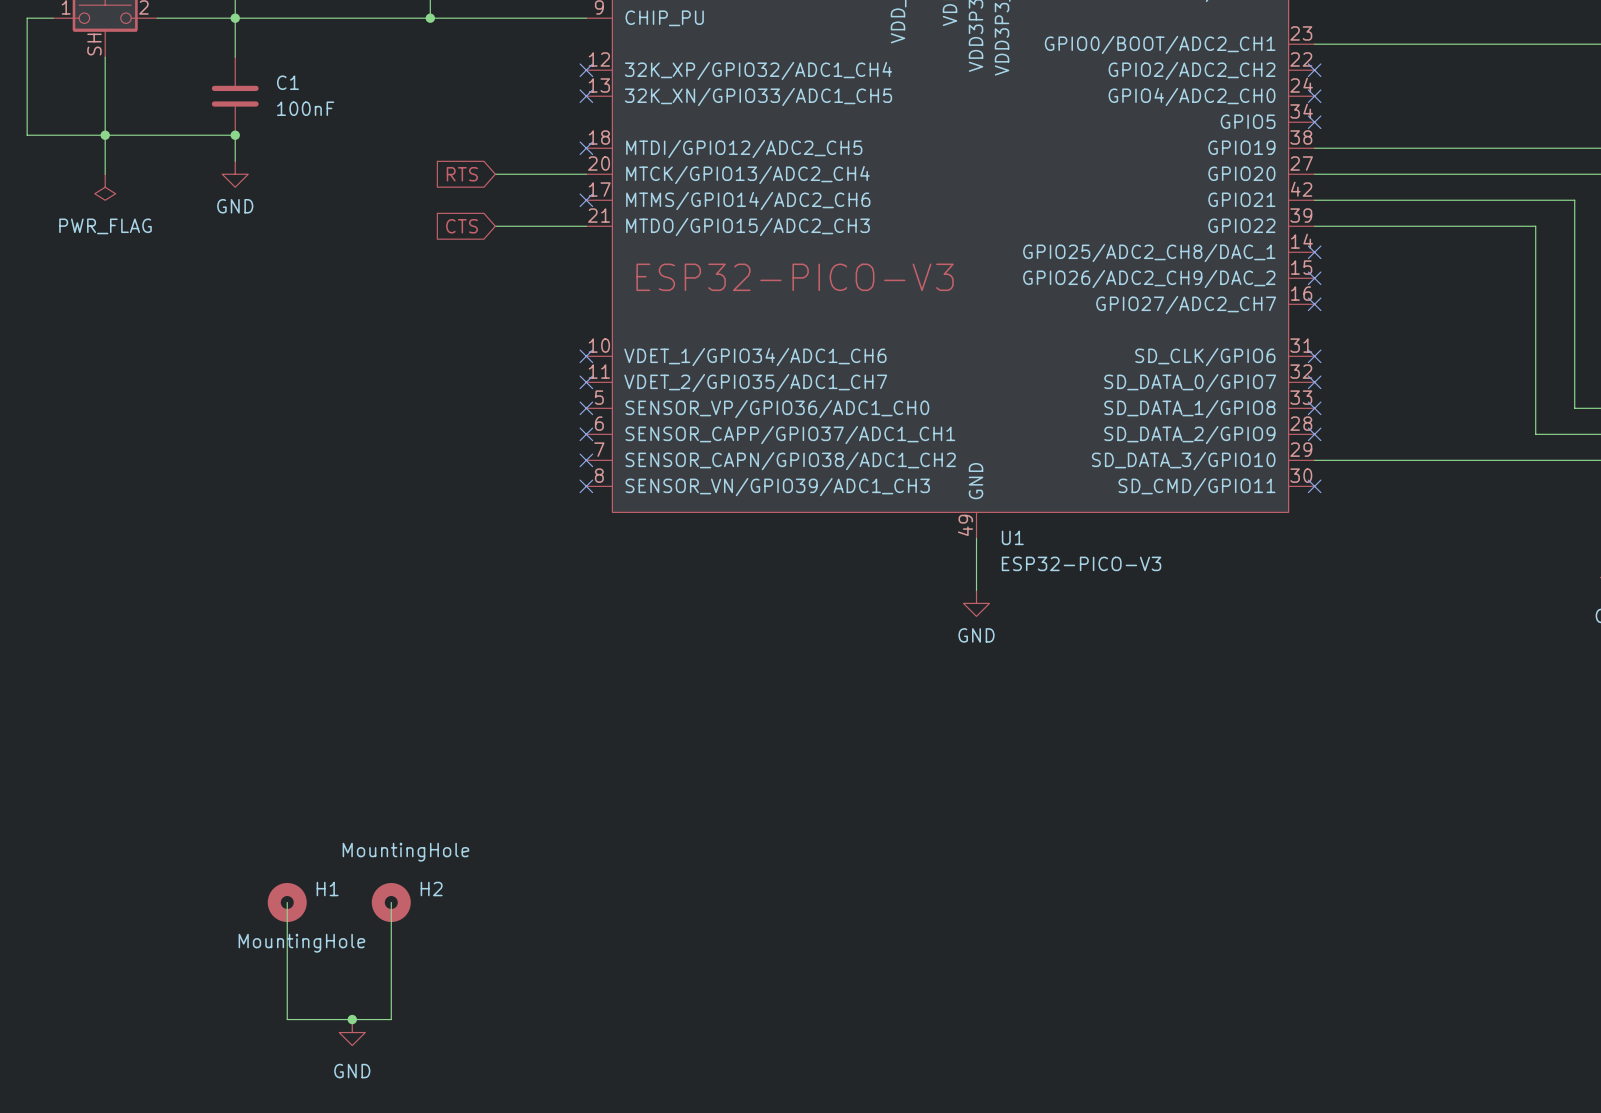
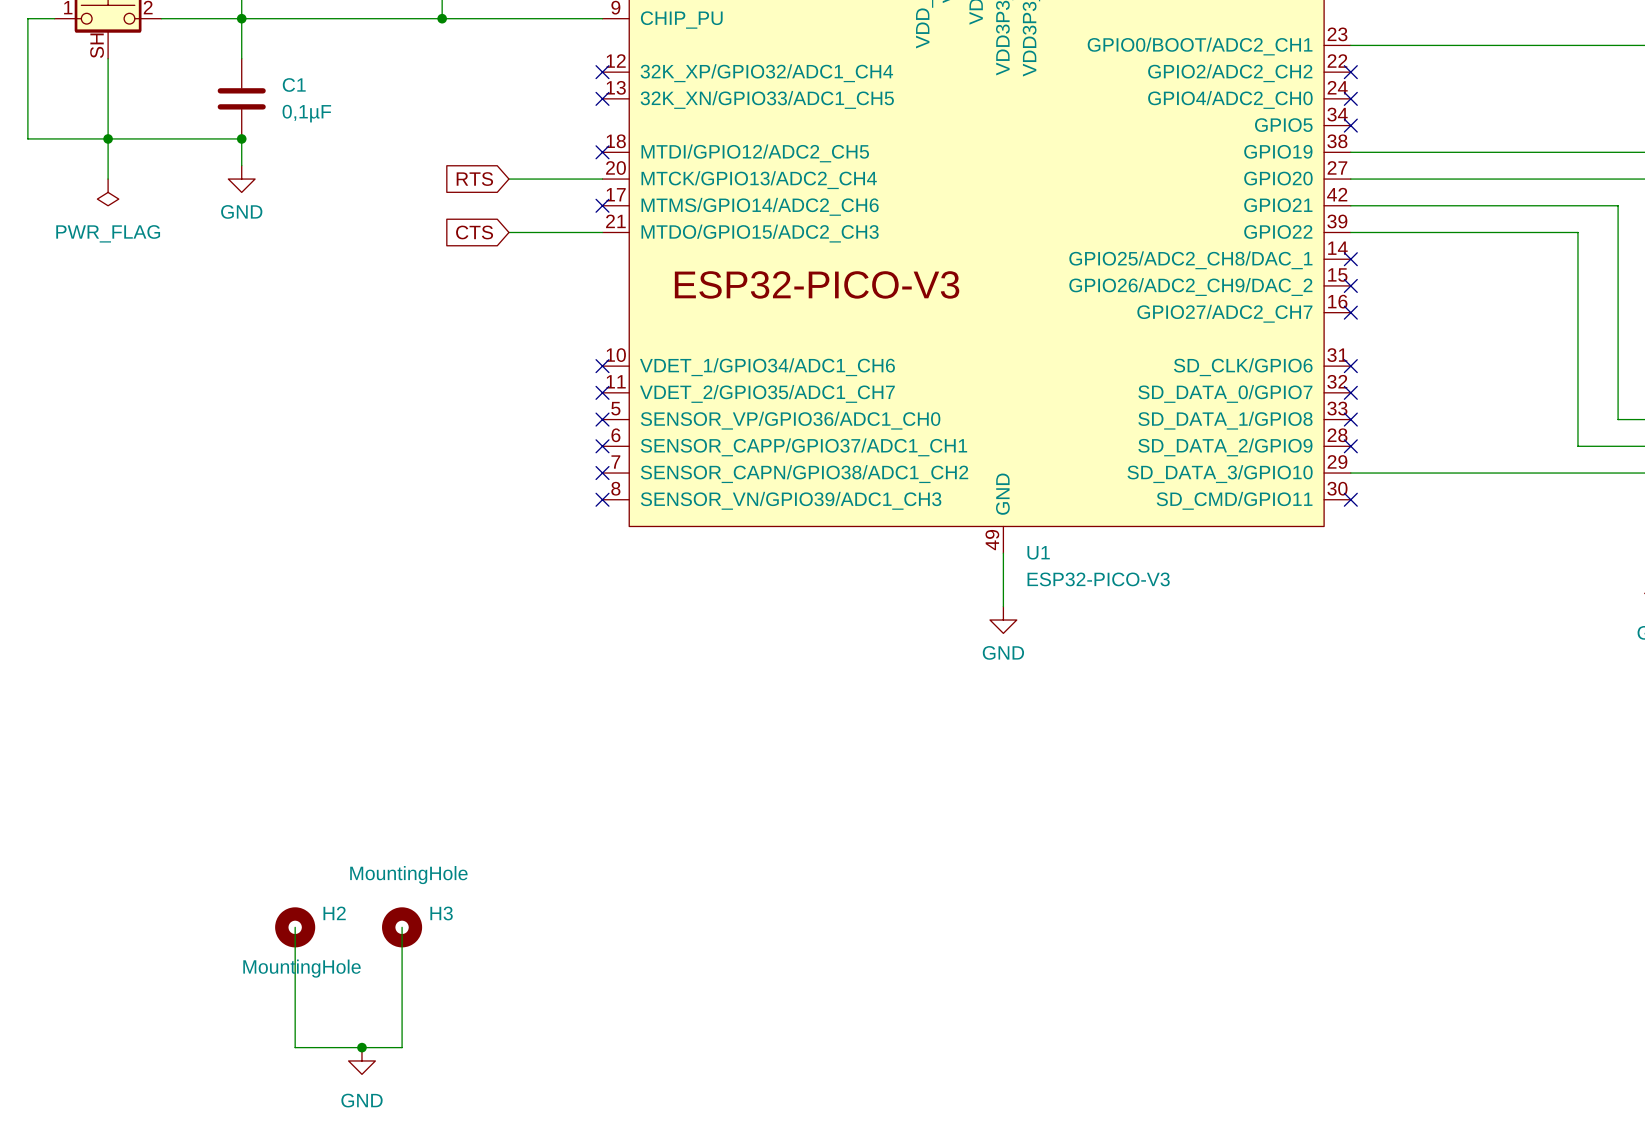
C1 value: 100nF (305, 108) -> 0,1µF (306, 113)
H1 name: H1 (327, 889) -> H2 (334, 913)
H2 name: H2 (431, 889) -> H3 (441, 913)

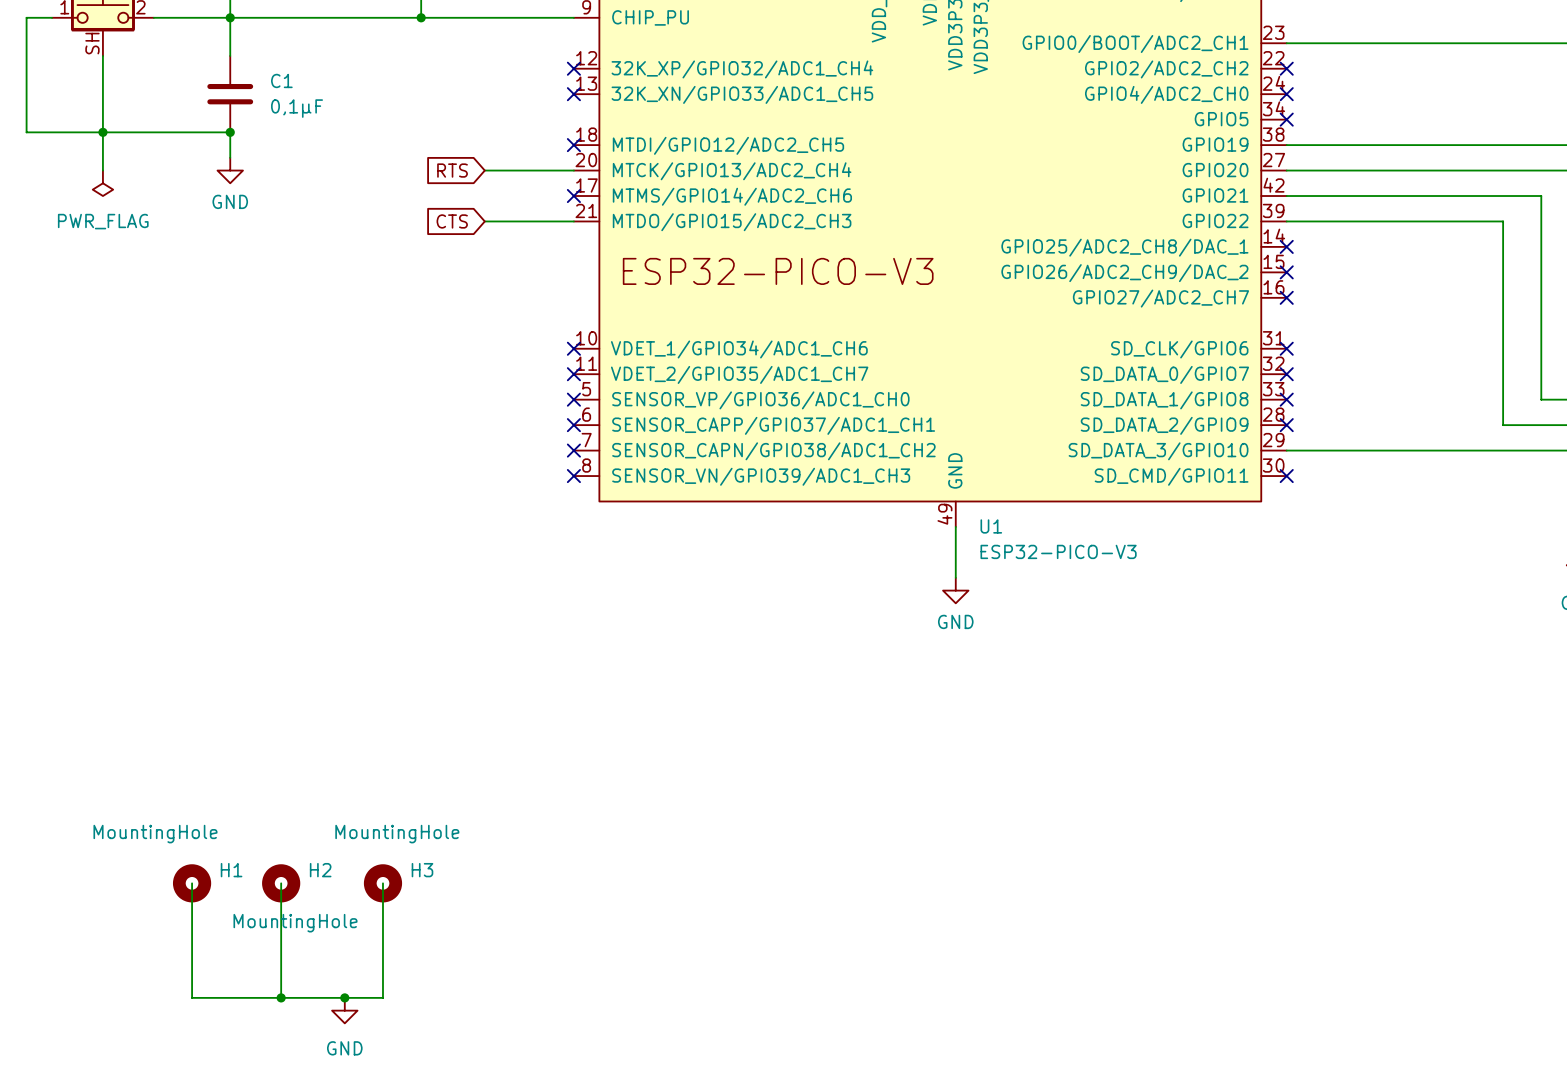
wire: none -> (192, 883) (192, 997) (281, 997)
H1: none -> MountingHole (192, 883)
junction: none -> (281, 997)

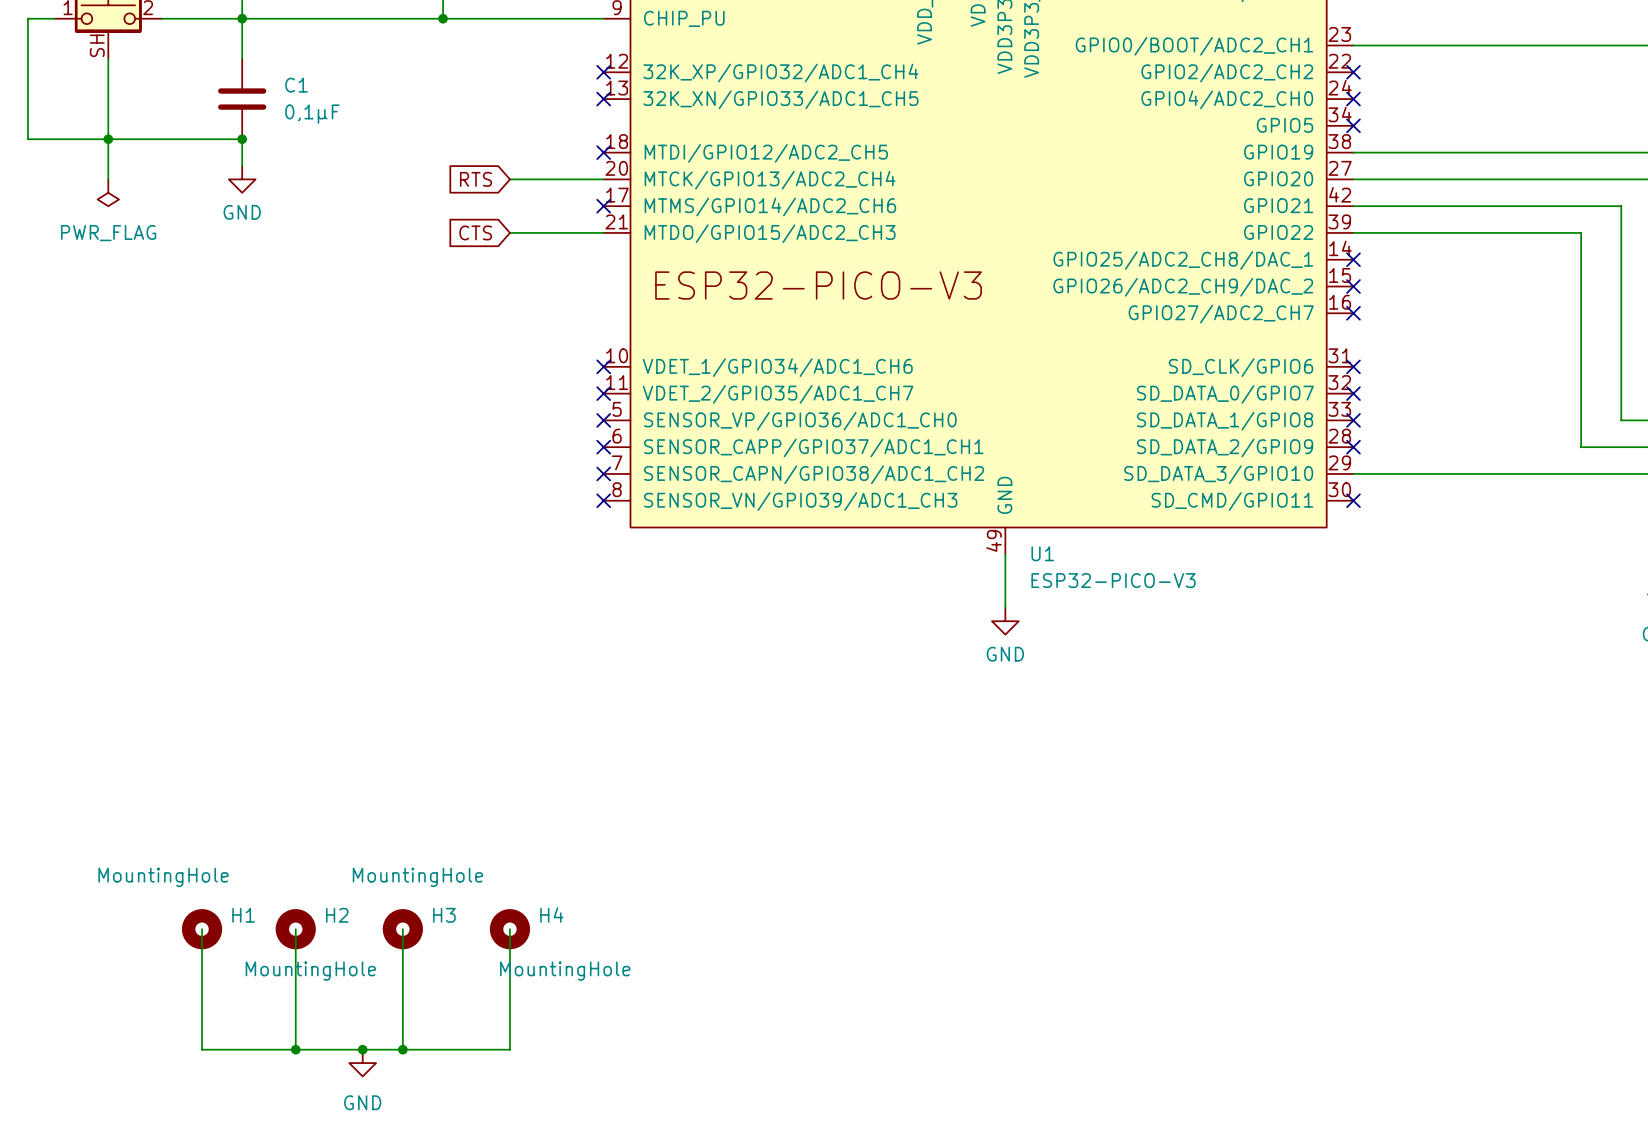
wire: none -> (509, 929) (509, 1049) (402, 1049)
H4: none -> MountingHole (509, 929)
junction: none -> (402, 1049)

